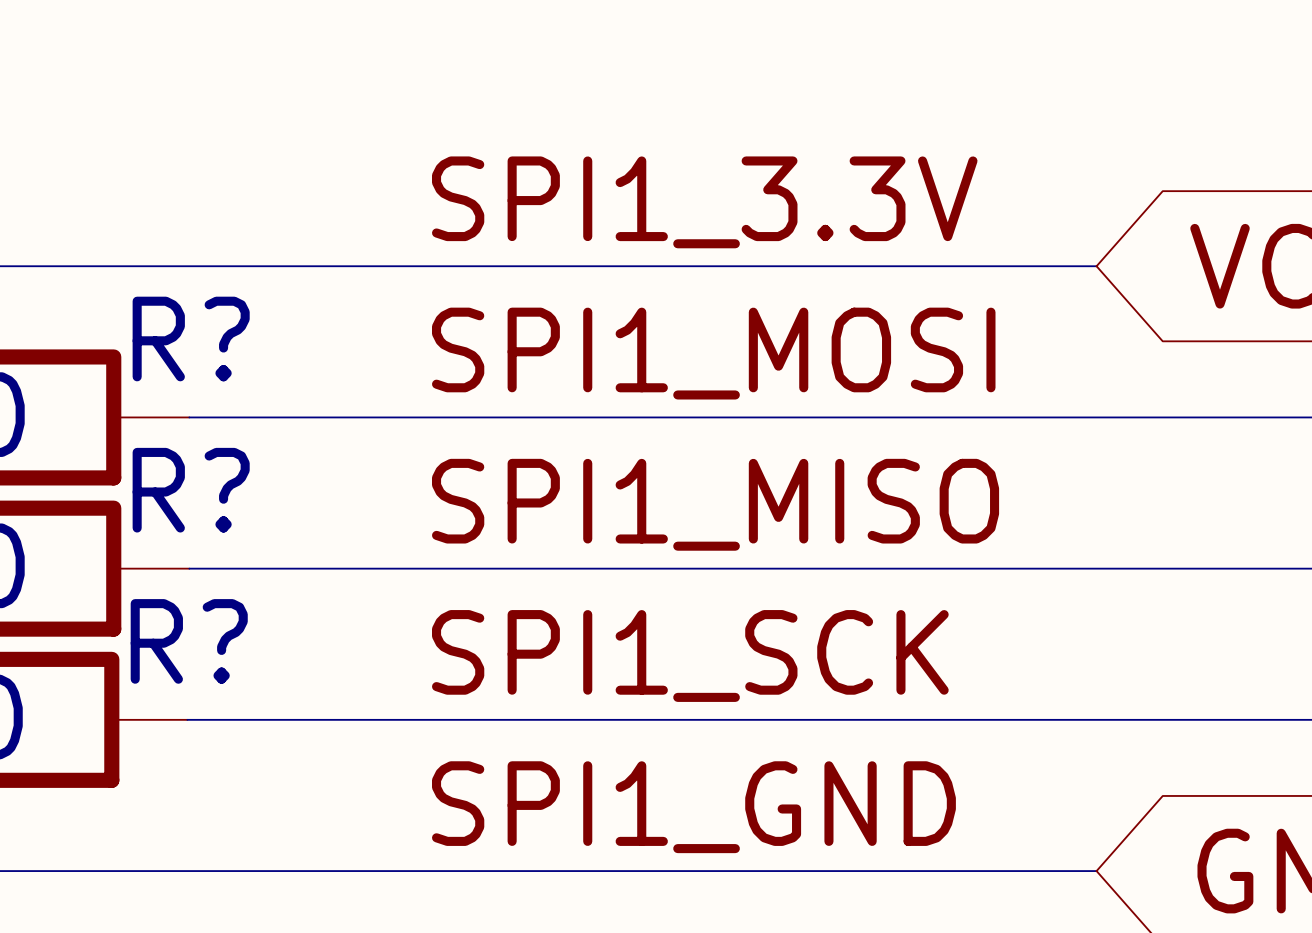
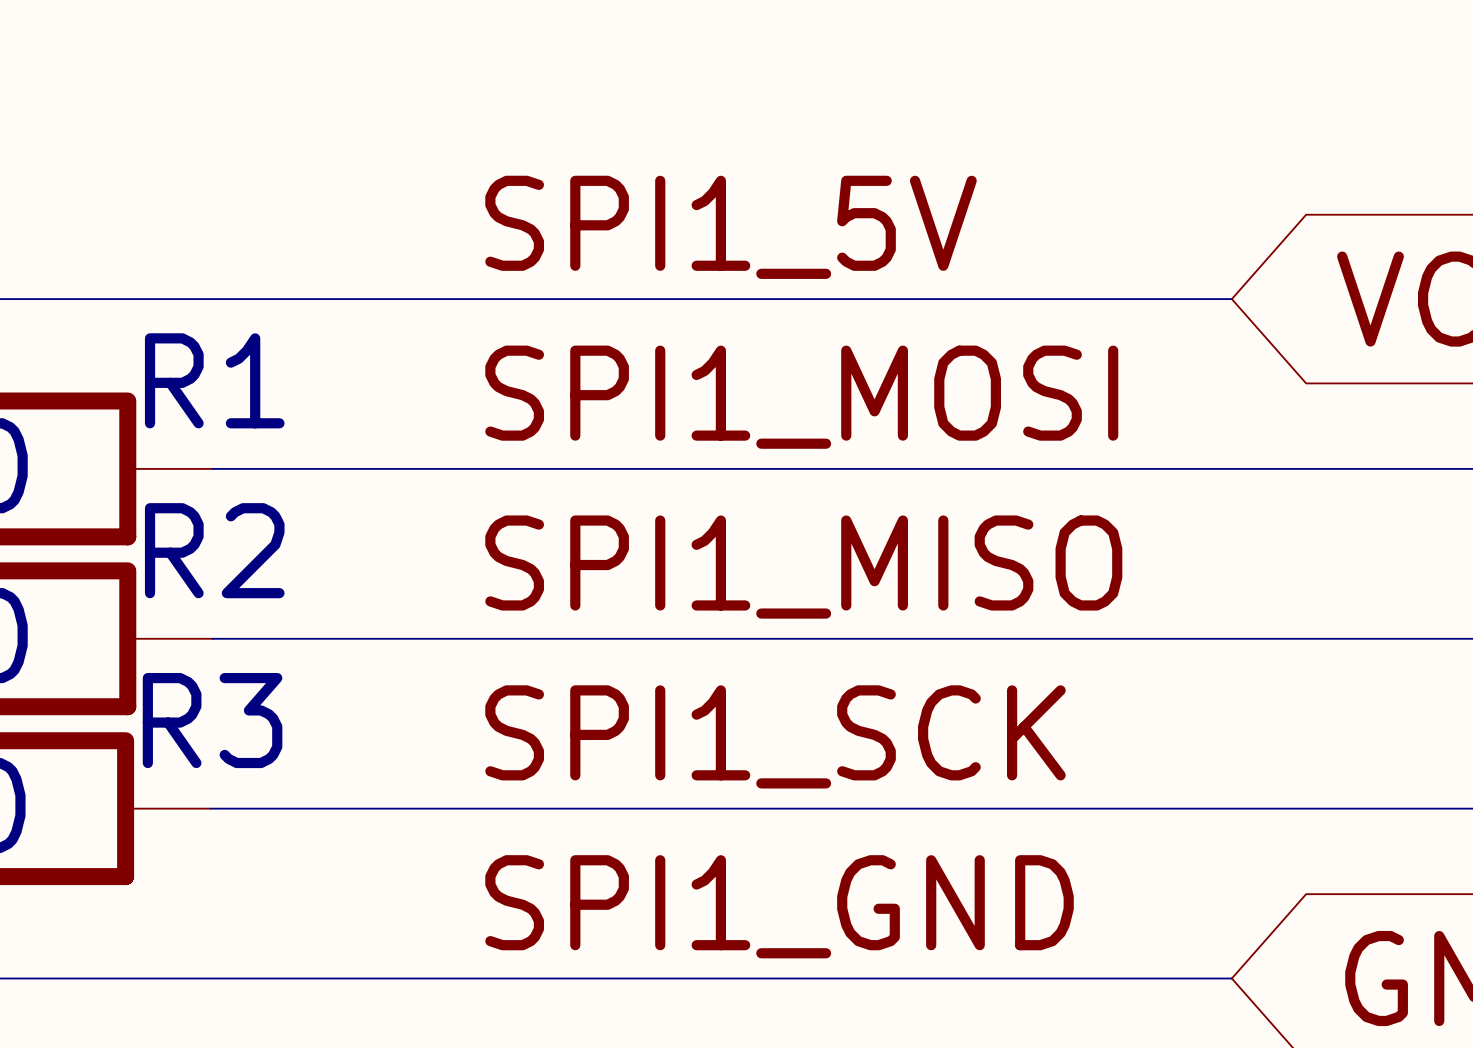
label: SPI1_3.3V (704, 202) -> SPI1_5V (731, 227)
R? name: R? (191, 339) -> R1 (214, 380)
R? name: R? (191, 490) -> R2 (214, 550)
R? name: R? (189, 641) -> R3 (212, 720)

